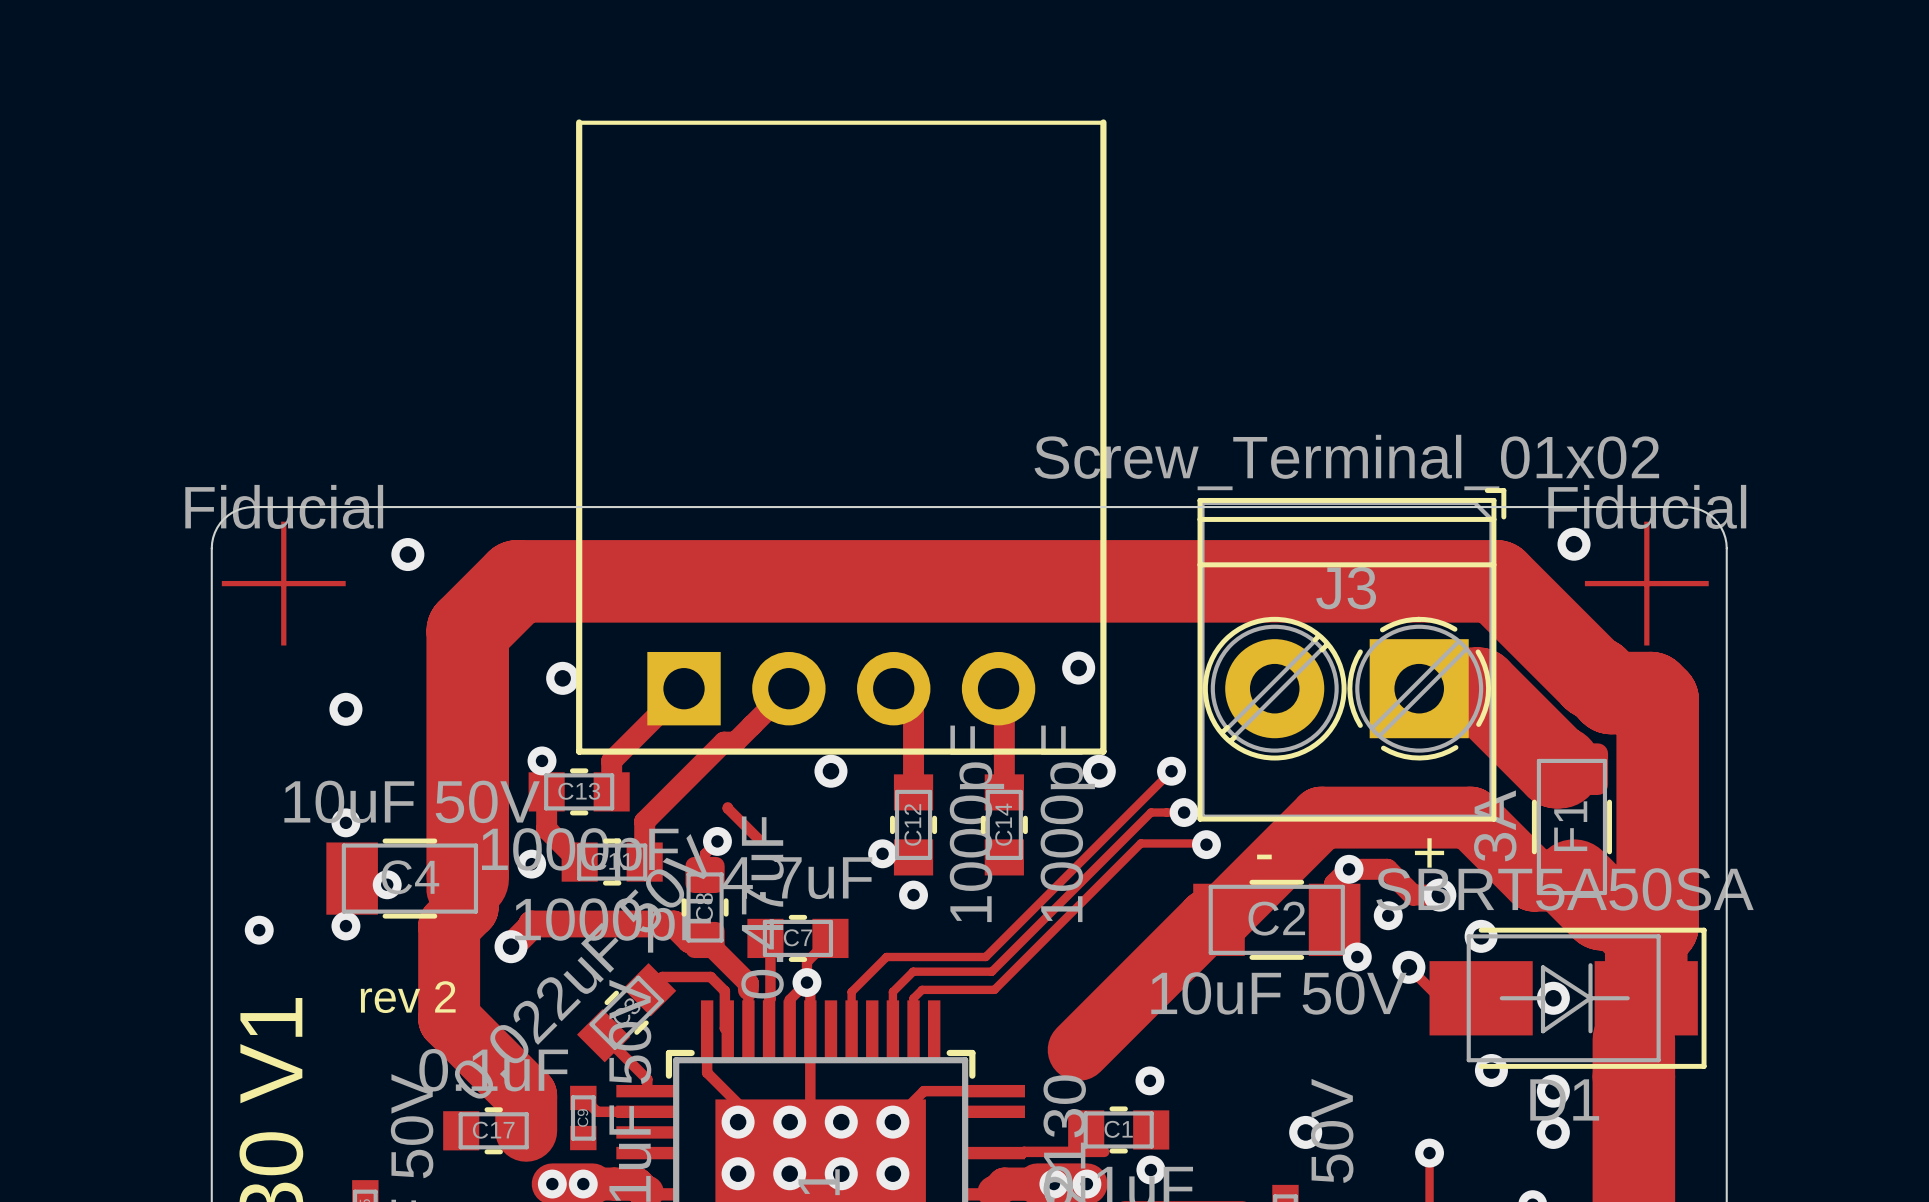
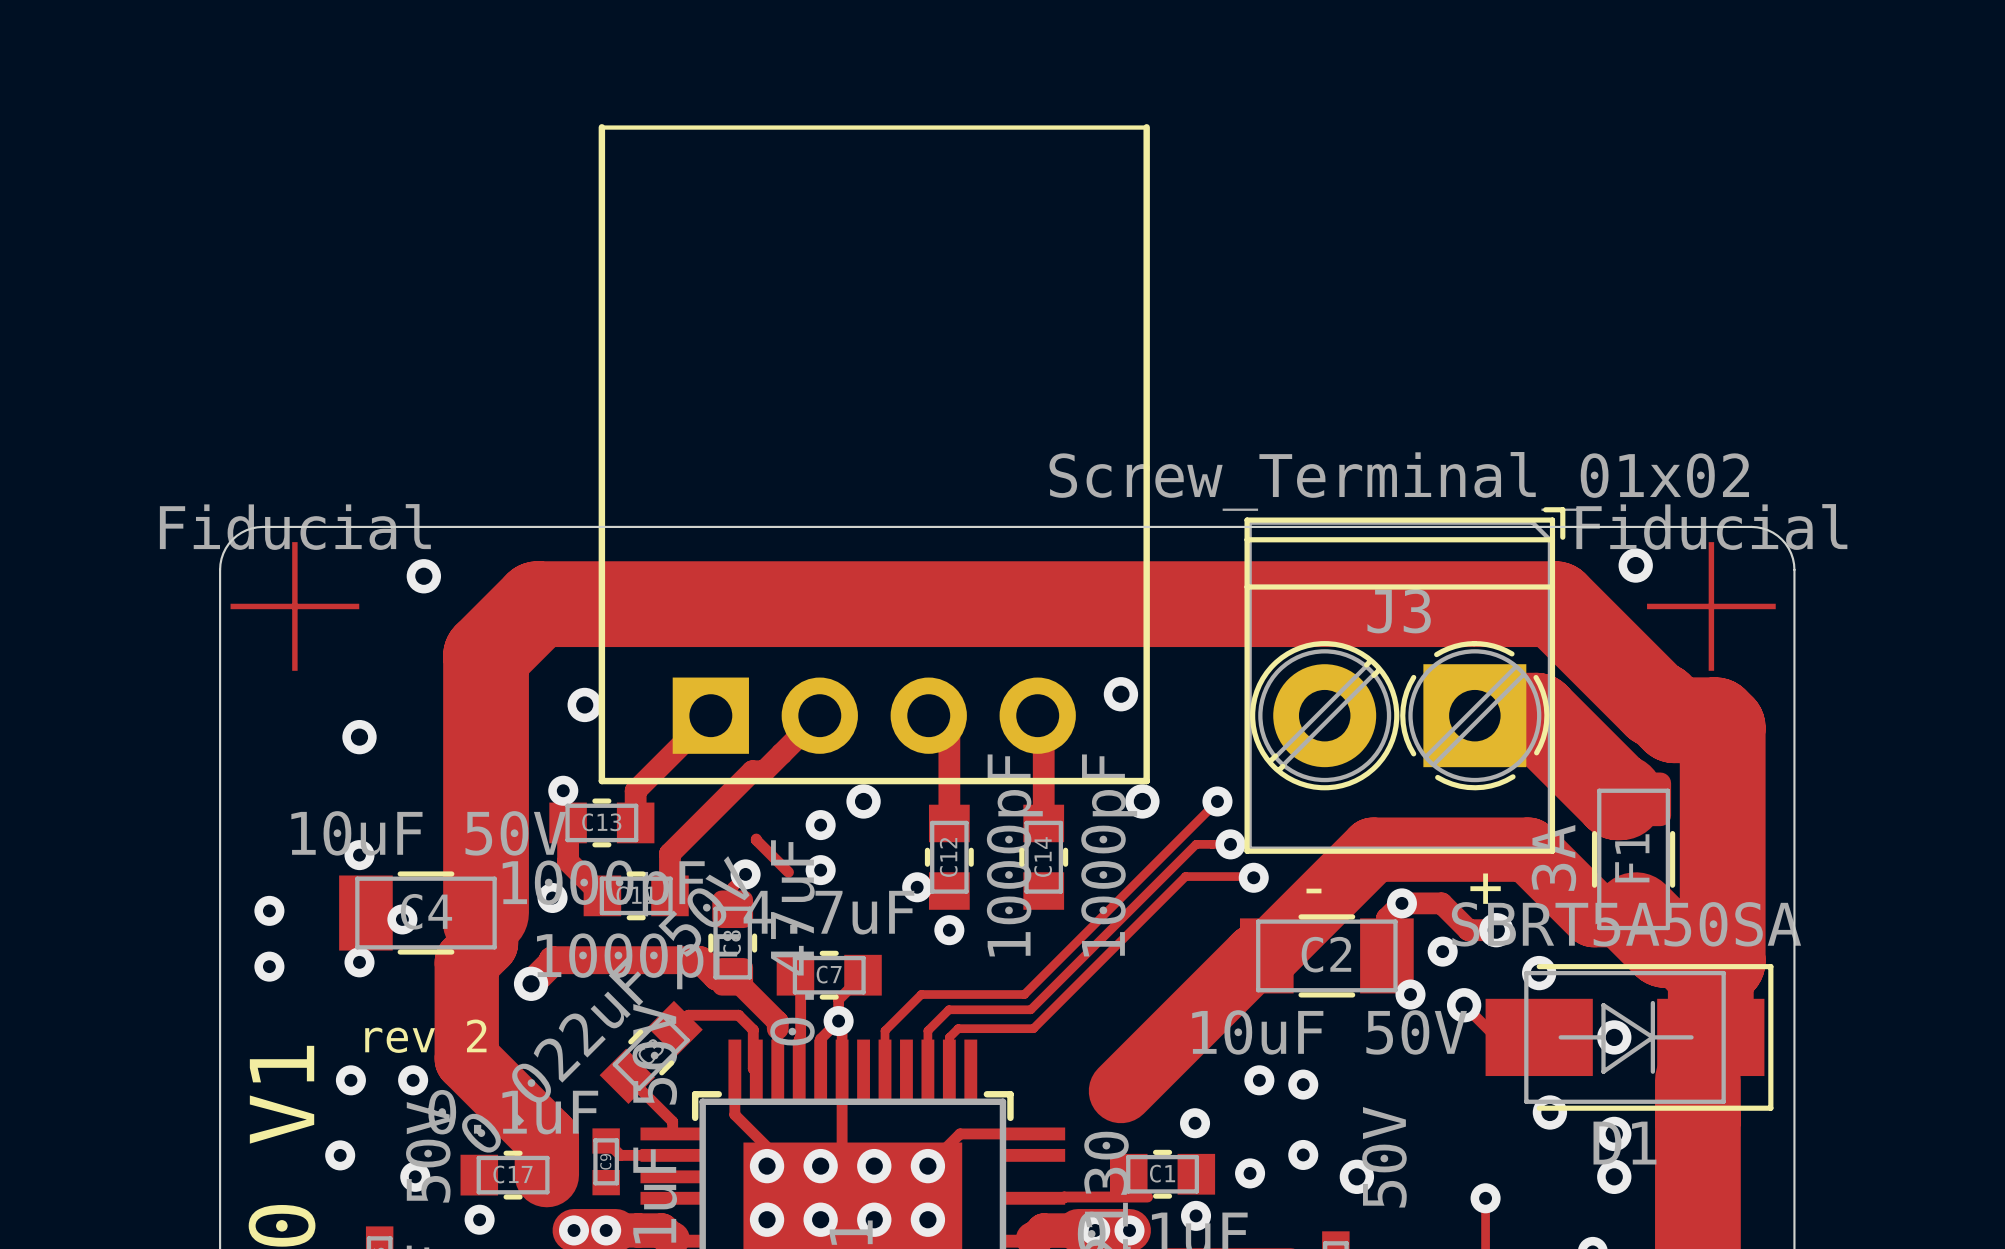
via: none -> (820, 825)
via: none -> (820, 870)
via: none -> (269, 910)
via: none -> (350, 1080)
via: none -> (413, 1080)
via: none -> (1259, 1080)
via: none -> (1303, 1084)
via: none -> (340, 1155)
via: none -> (1303, 1154)
via: none -> (1250, 1173)
via: none -> (415, 1176)
via: none -> (479, 1219)

